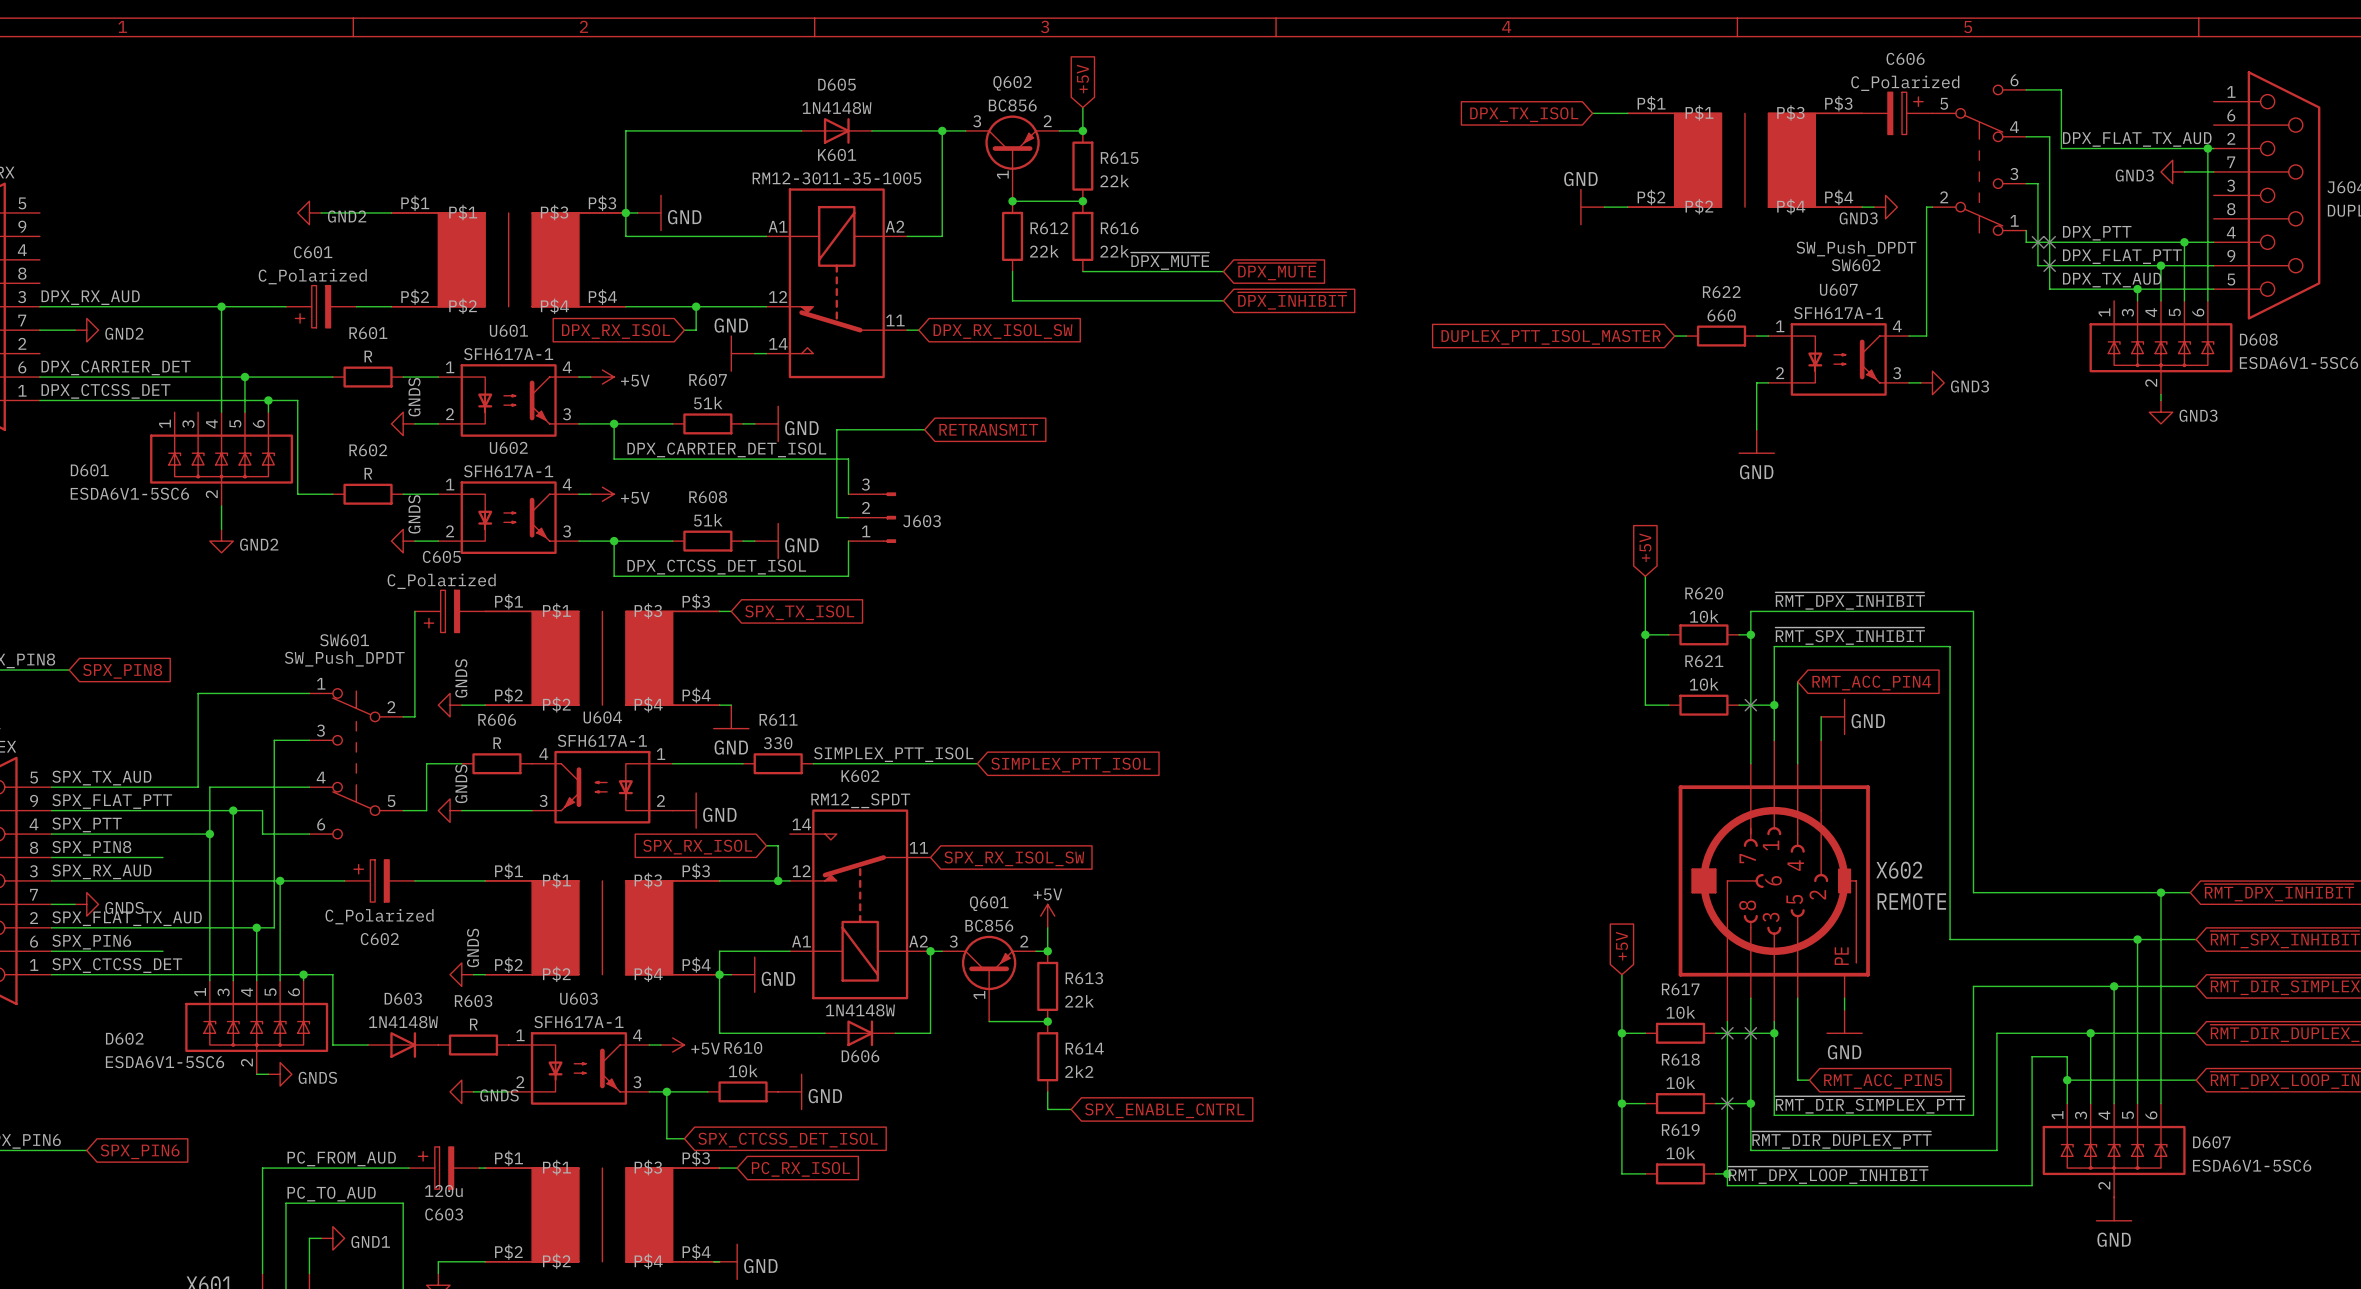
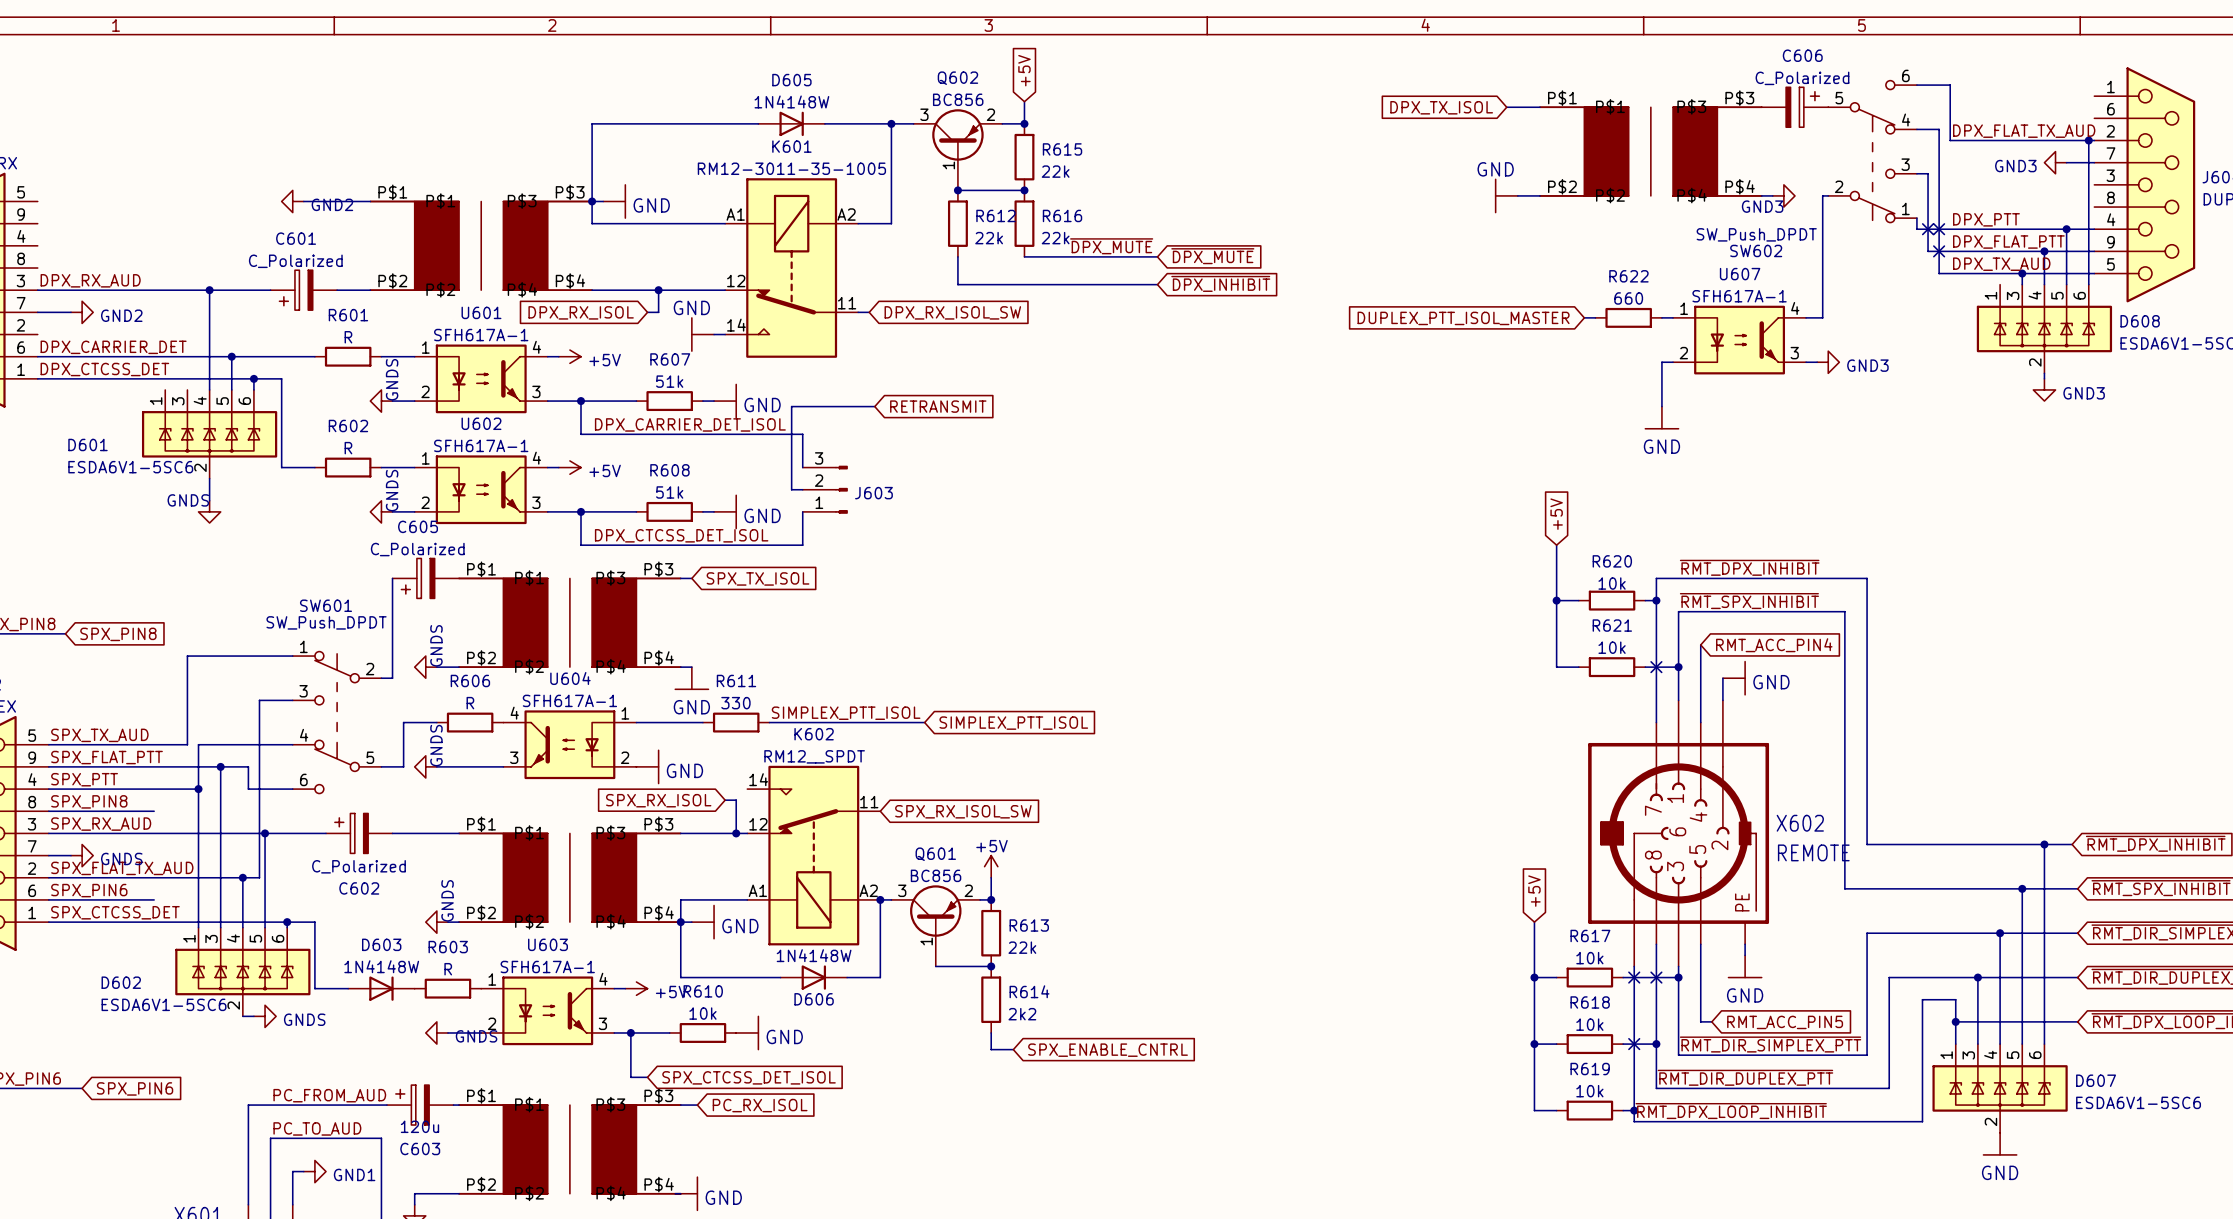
power symbol: GND2 (221, 541) -> GNDS (209, 511)

